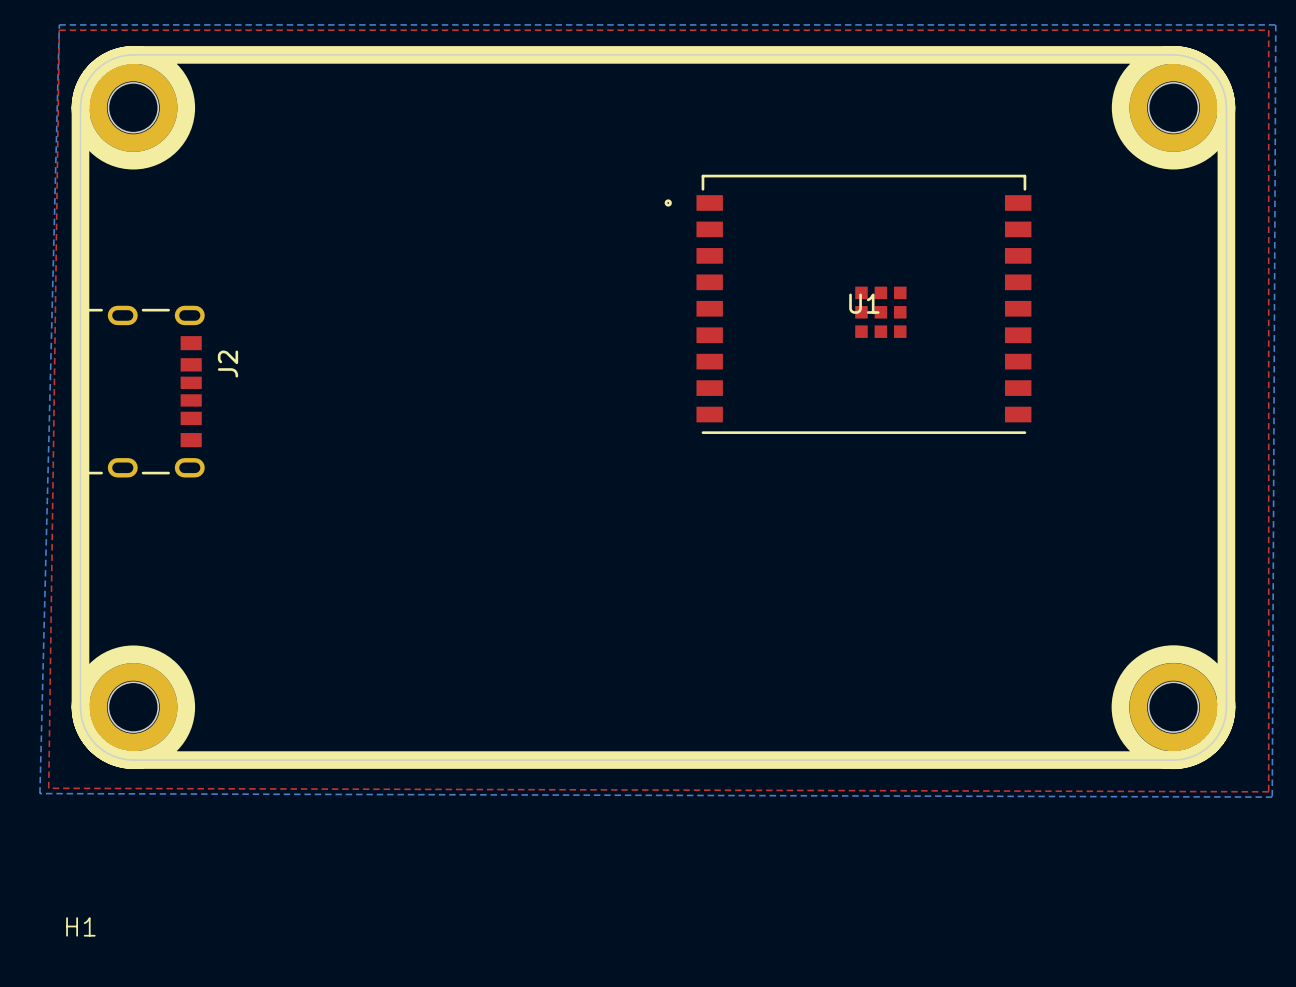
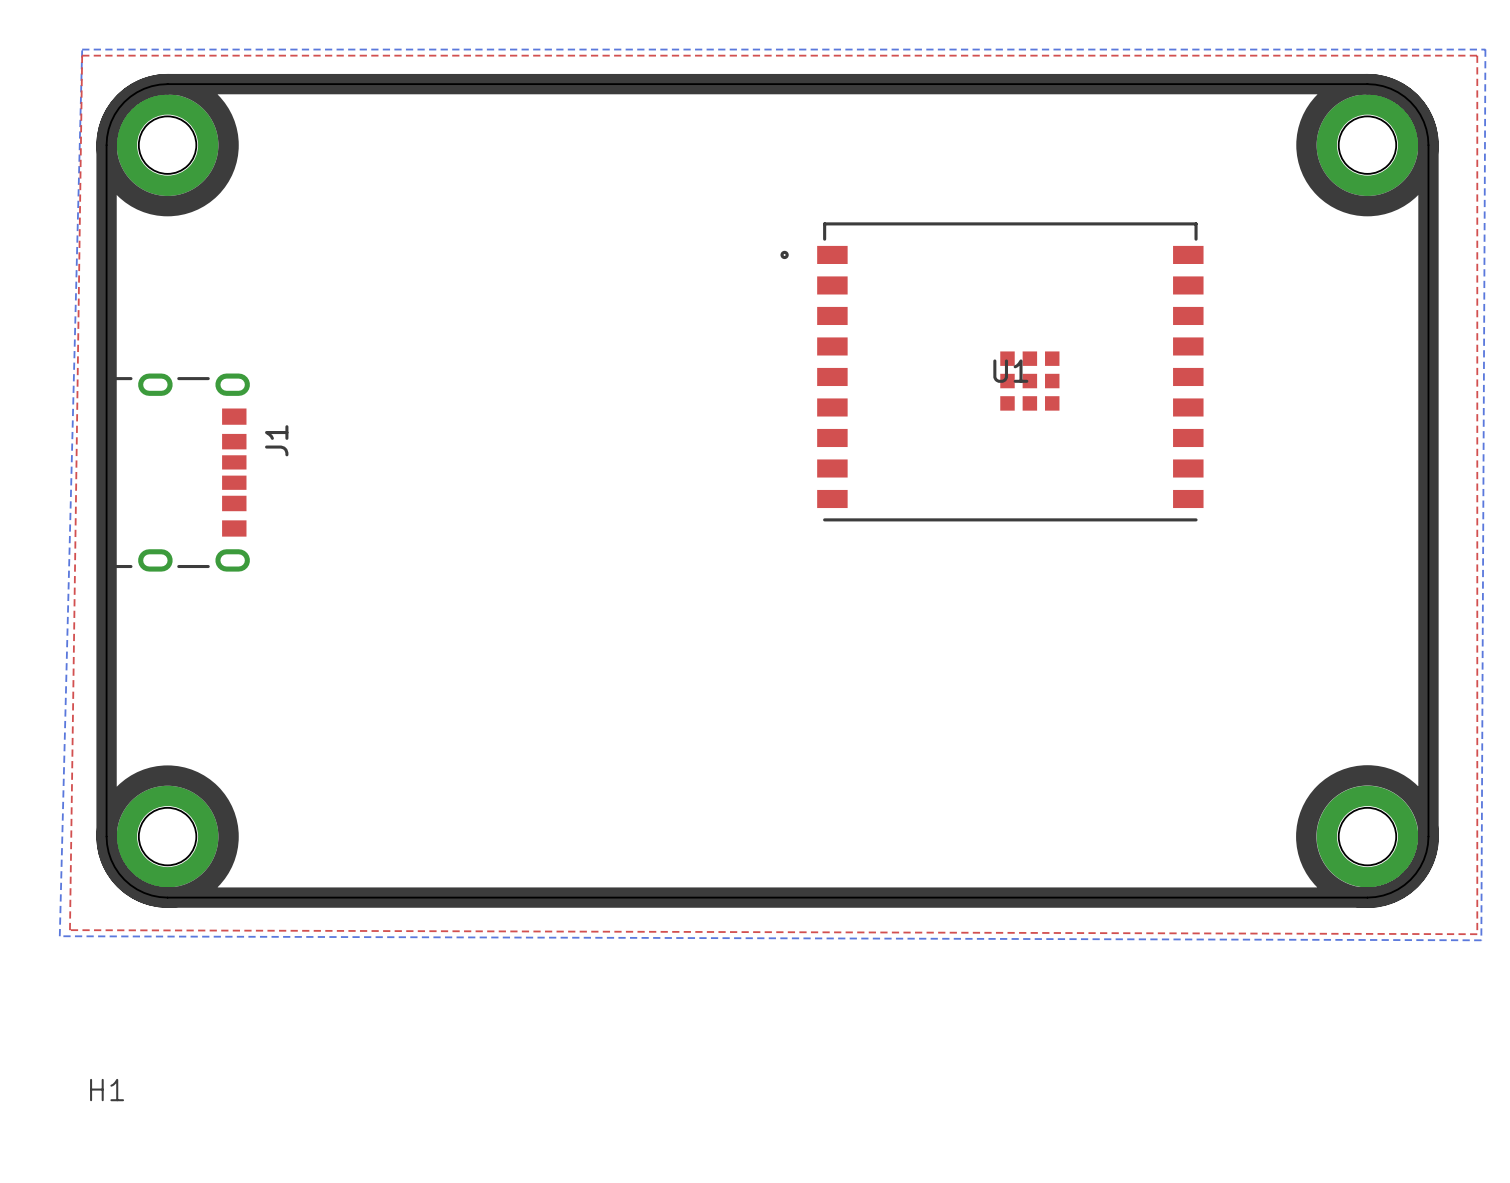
J2 name: J2 (228, 364) -> J1 (276, 440)

